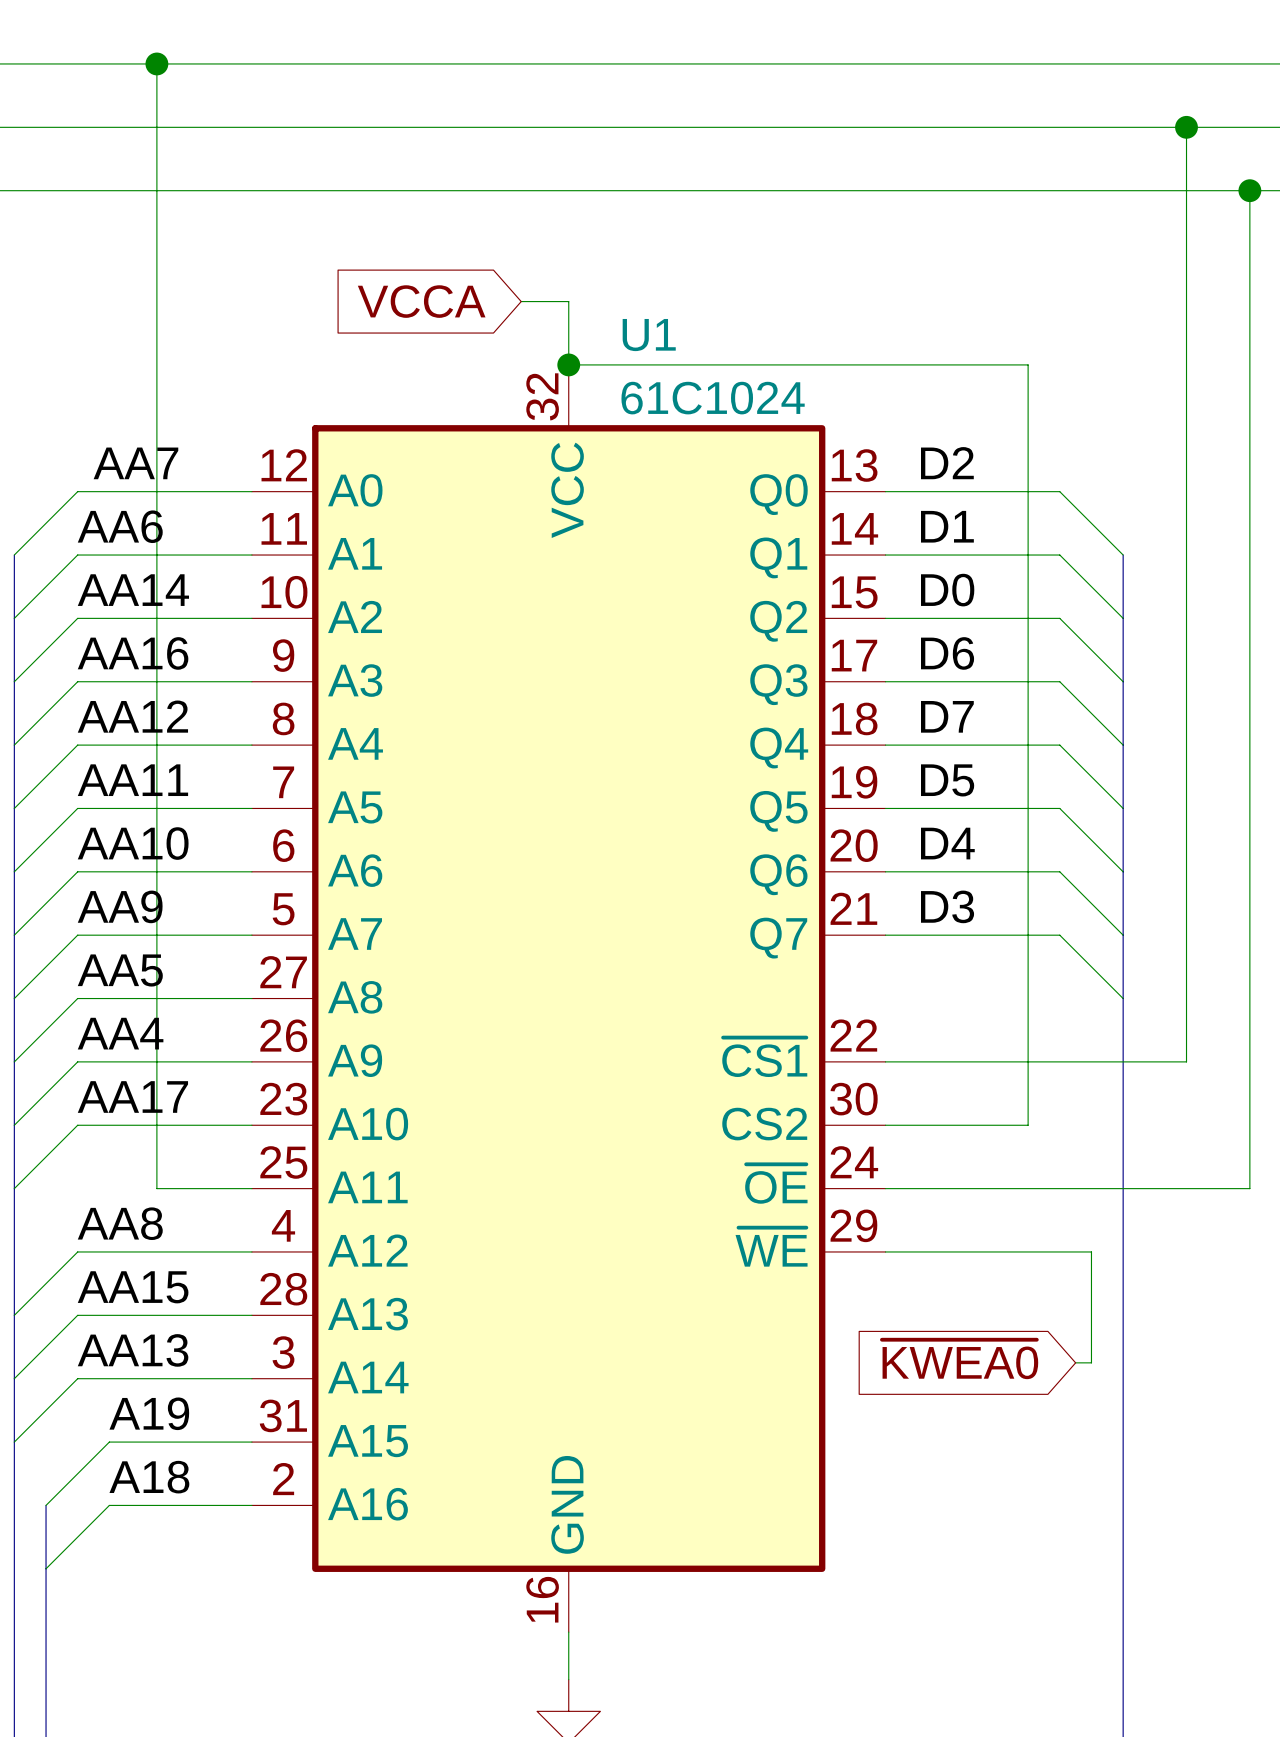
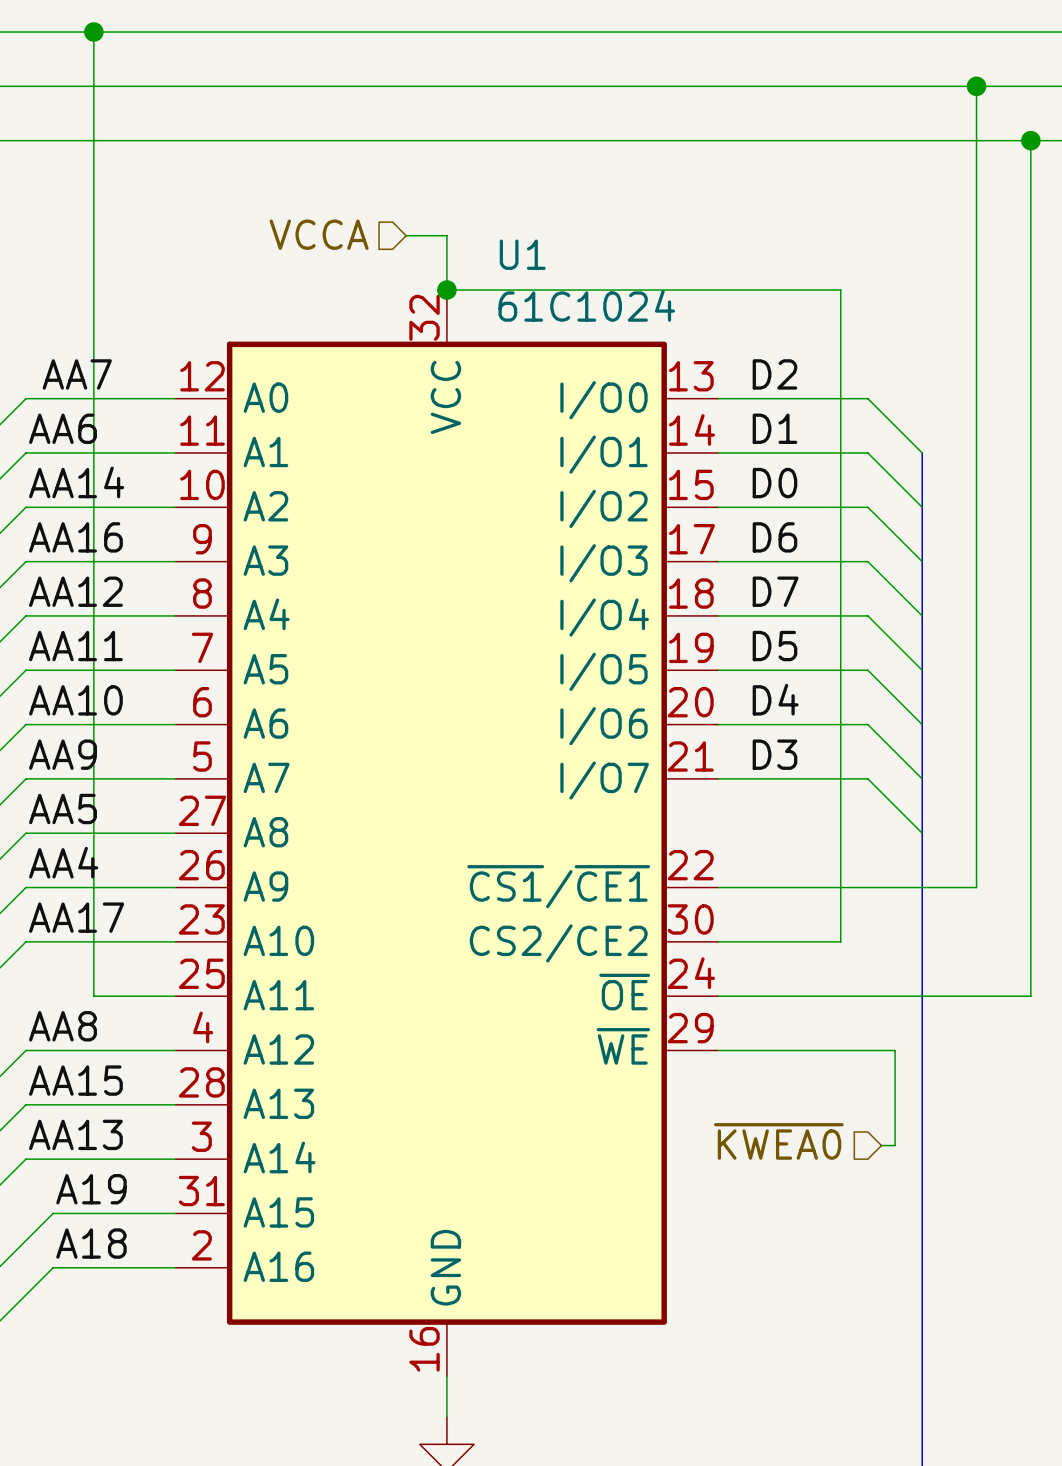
hierarchical label: none -> VCCA (319, 234)
global label: VCCA (421, 301) -> none
U1 symbol: [251, 364, 886, 1633] -> [175, 290, 719, 1377]
hierarchical label: none -> ~{KWEA0} (778, 1141)
global label: ~{KWEA0} (960, 1359) -> none

